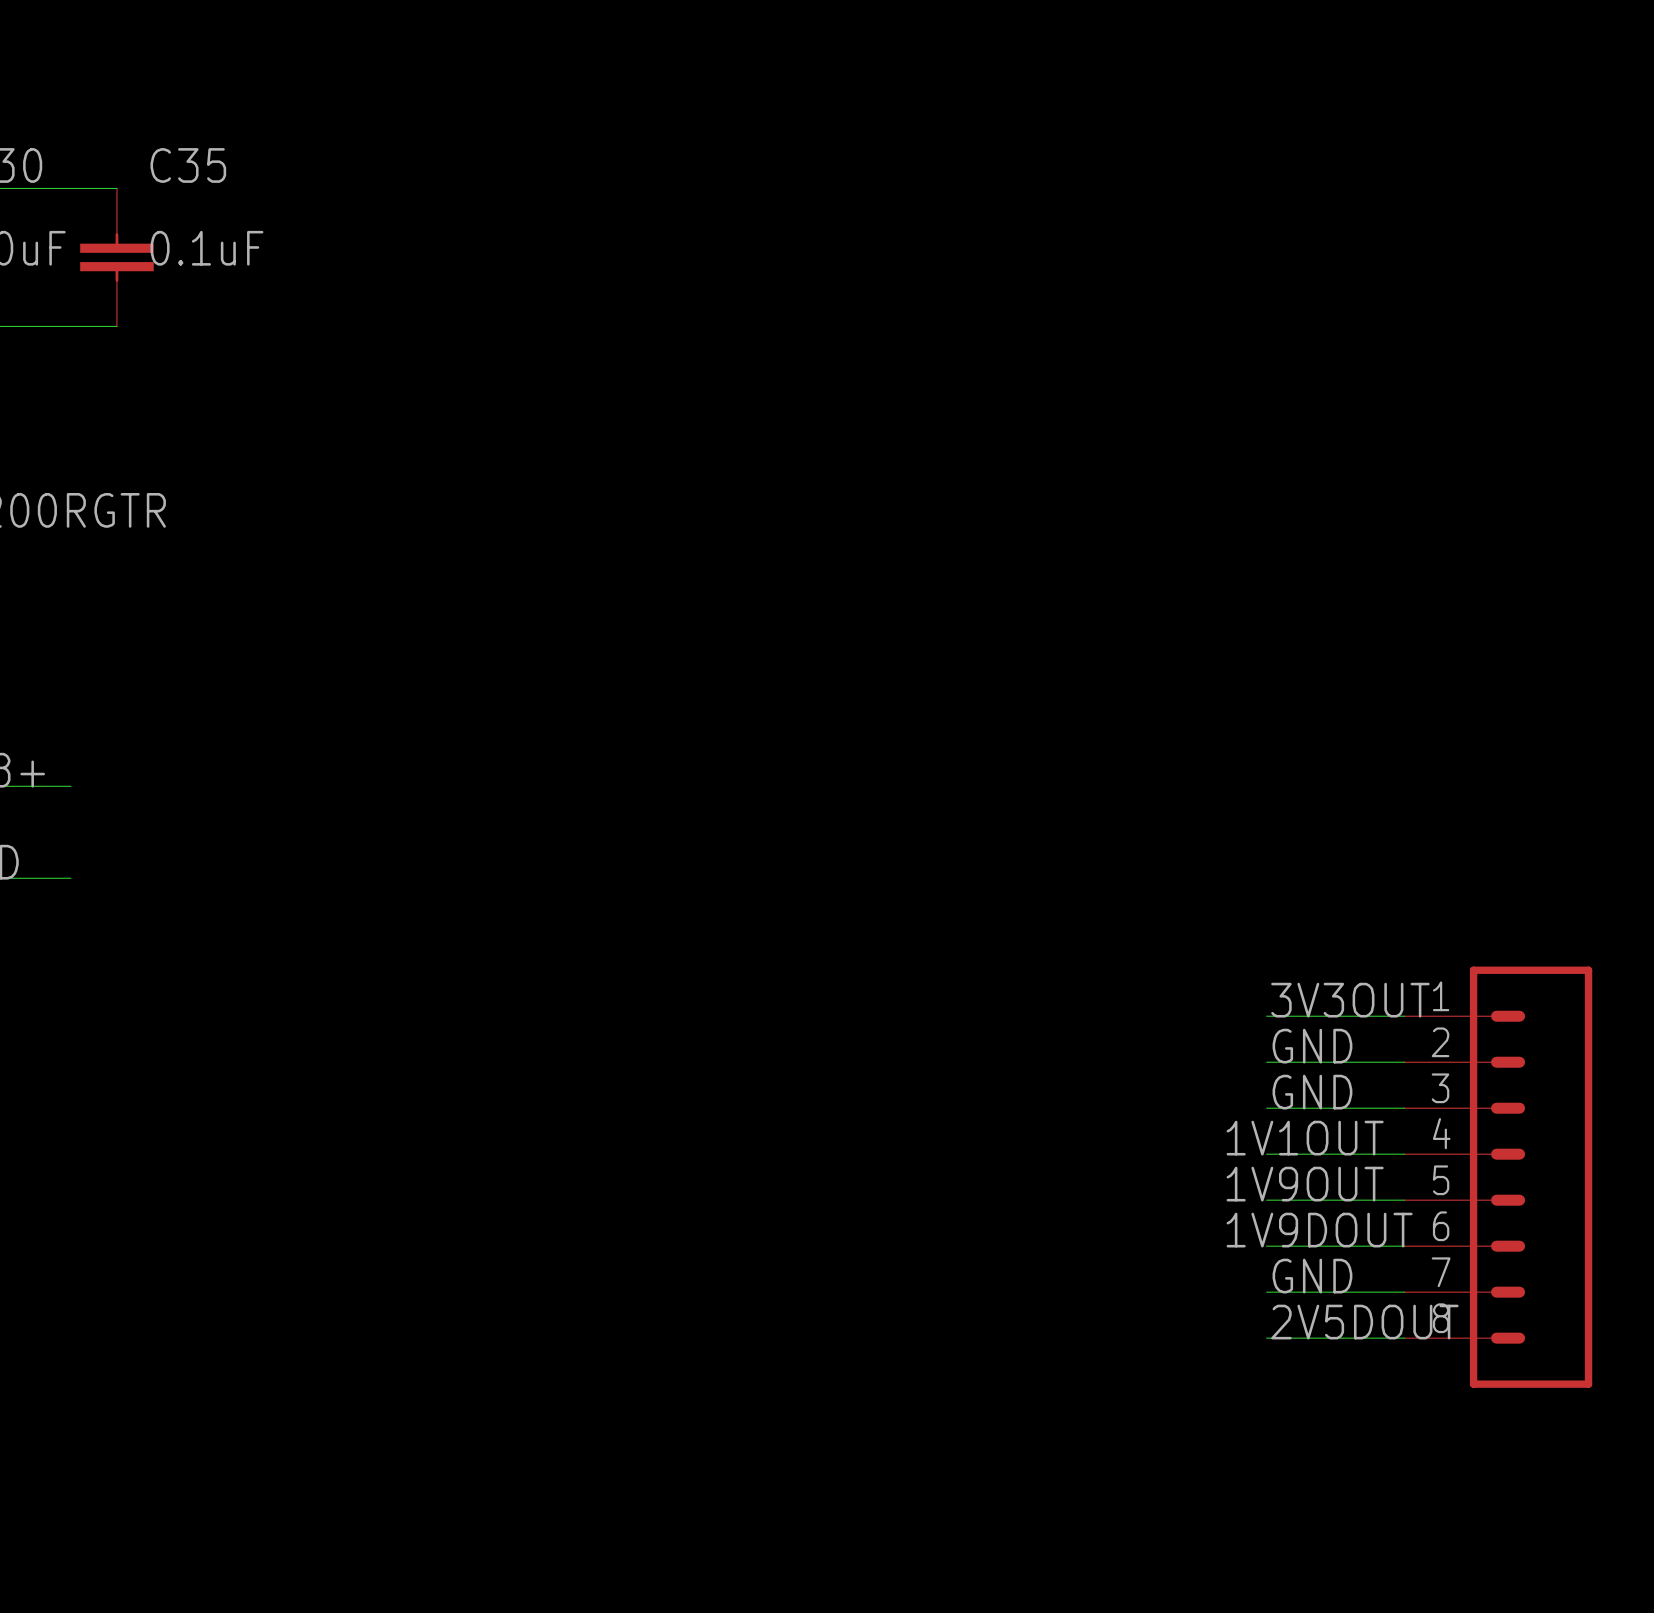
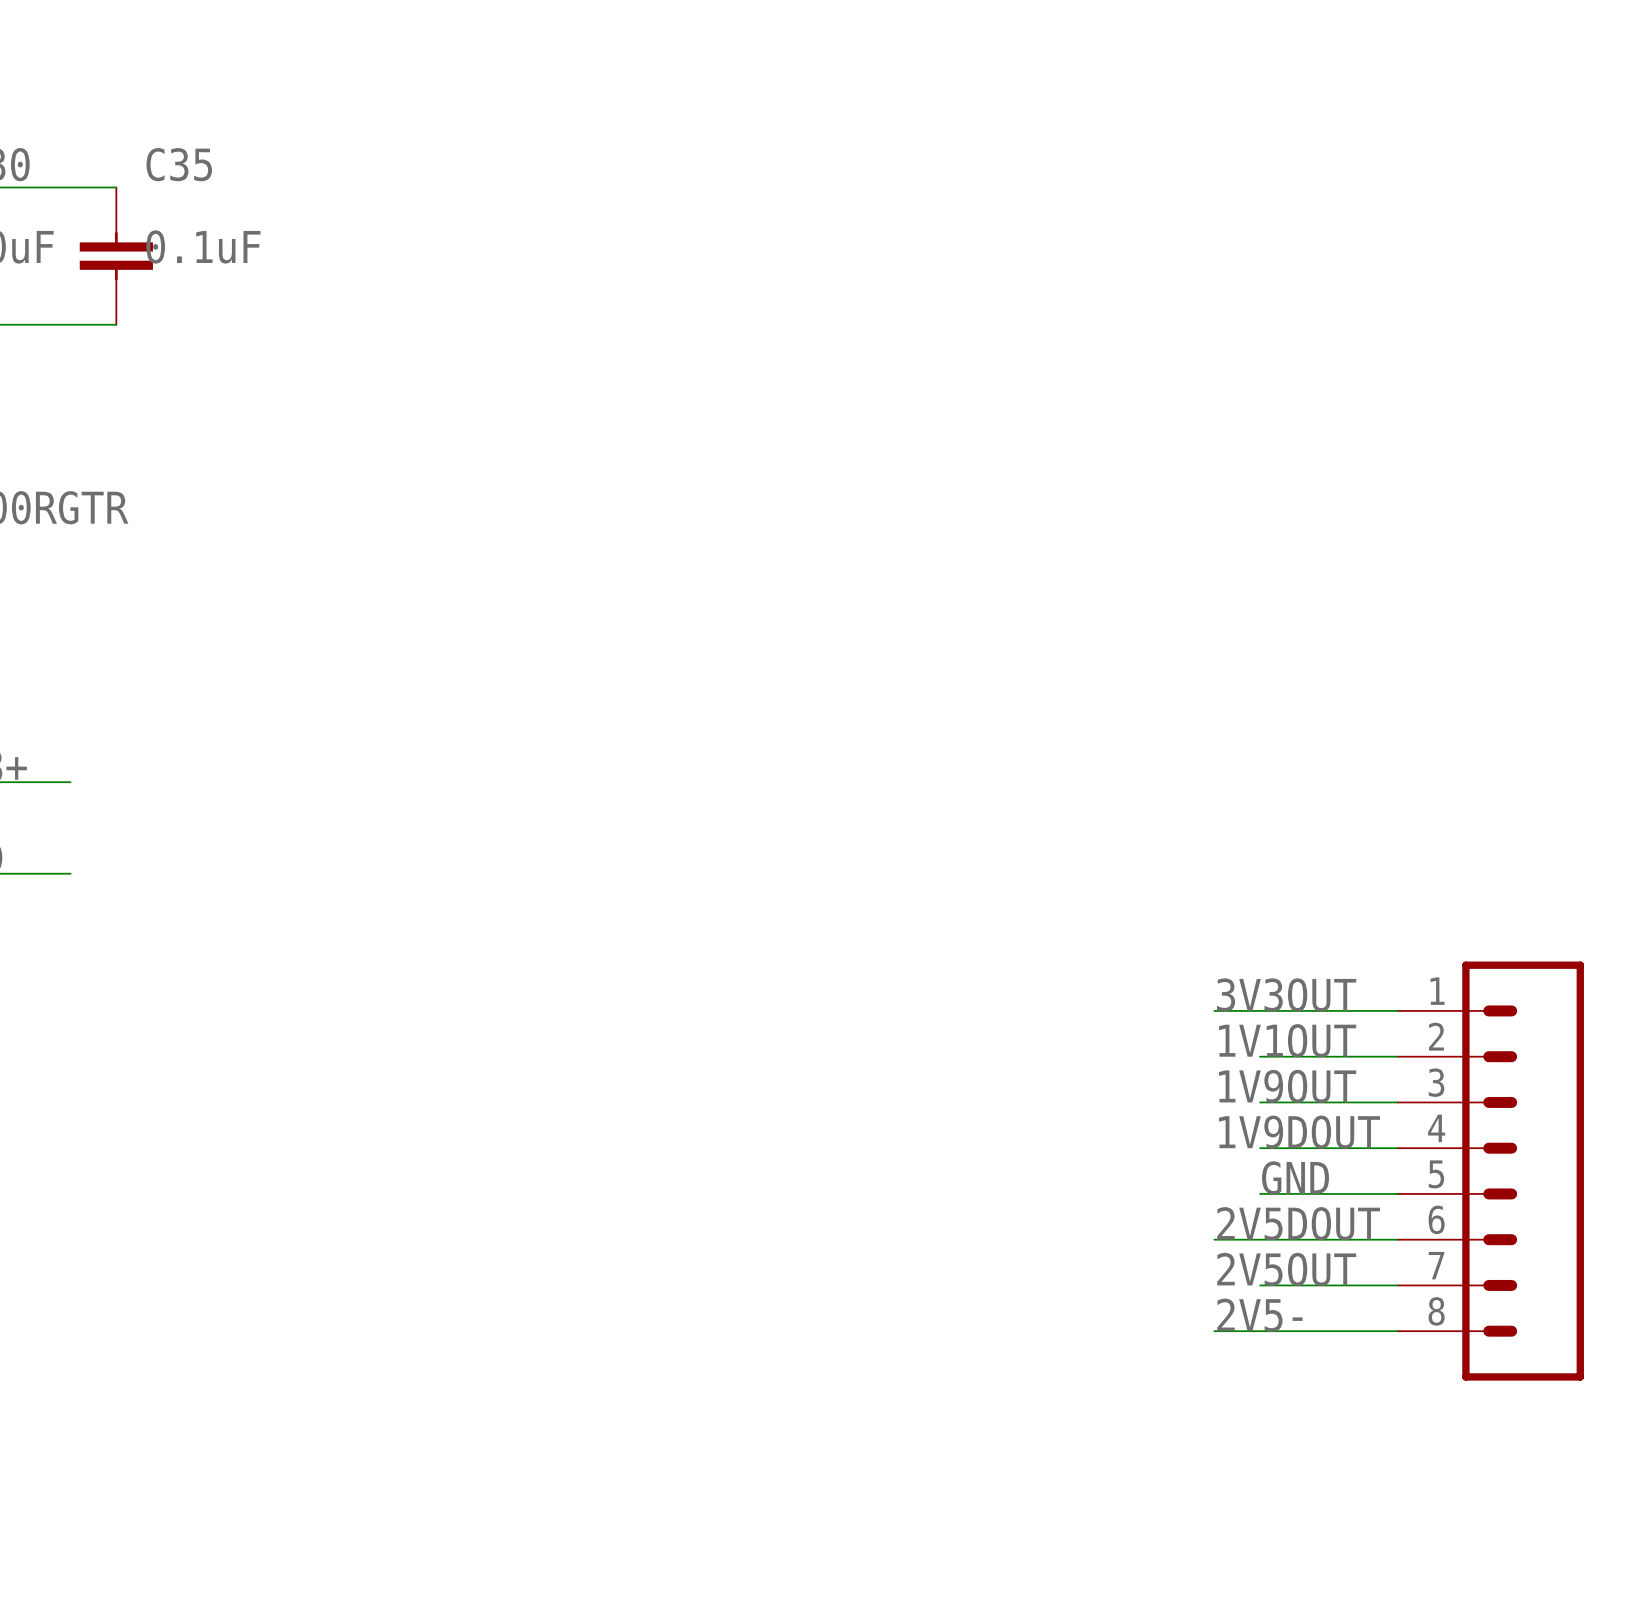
label position: 3V3OUT (1350, 1000) -> 3V3OUT (1286, 994)
wire: none -> (1214, 1010) (1260, 1010)
label: none -> 1V1OUT (1287, 1040)
label: GND (1312, 1046) -> none
label: GND (1312, 1092) -> none
label: 1V1OUT (1305, 1138) -> 1V9DOUT (1299, 1132)
label position: 1V9OUT (1305, 1184) -> 1V9OUT (1287, 1086)
label: none -> GND (1295, 1177)
label: 1V9DOUT (1319, 1230) -> 2V5DOUT (1298, 1223)
wire: none -> (1214, 1239) (1260, 1239)
label: GND (1312, 1276) -> none
label: none -> 2V5- (1259, 1315)
label: 2V5DOUT (1364, 1322) -> 2V5OUT (1286, 1269)
wire: none -> (1214, 1331) (1260, 1331)

